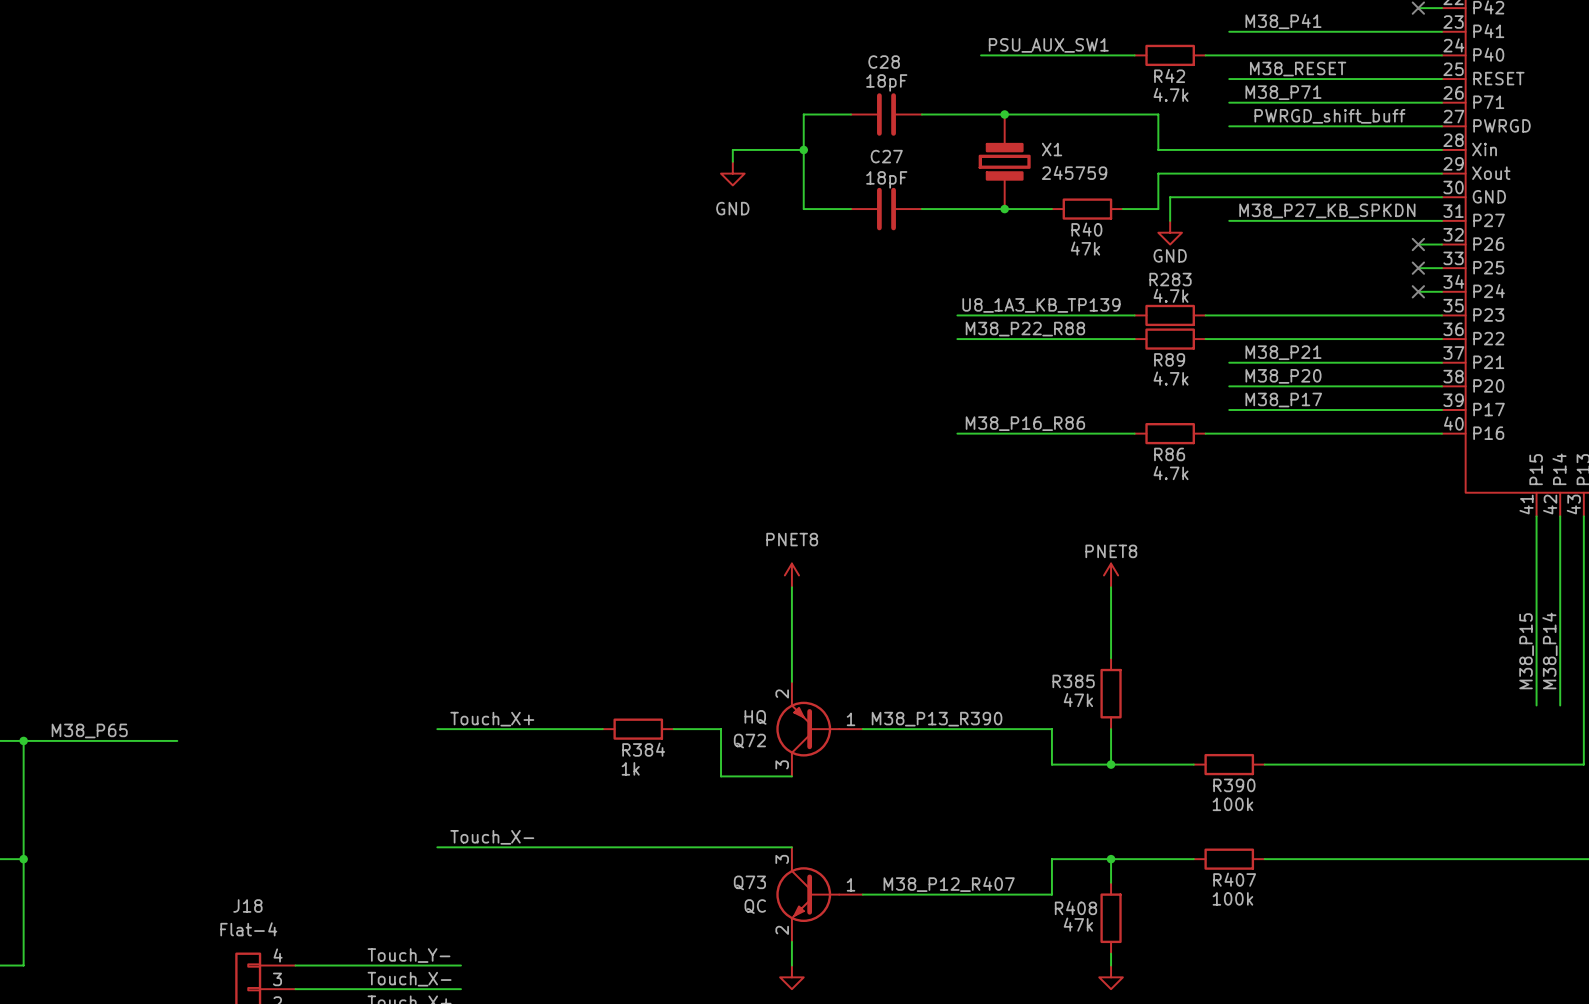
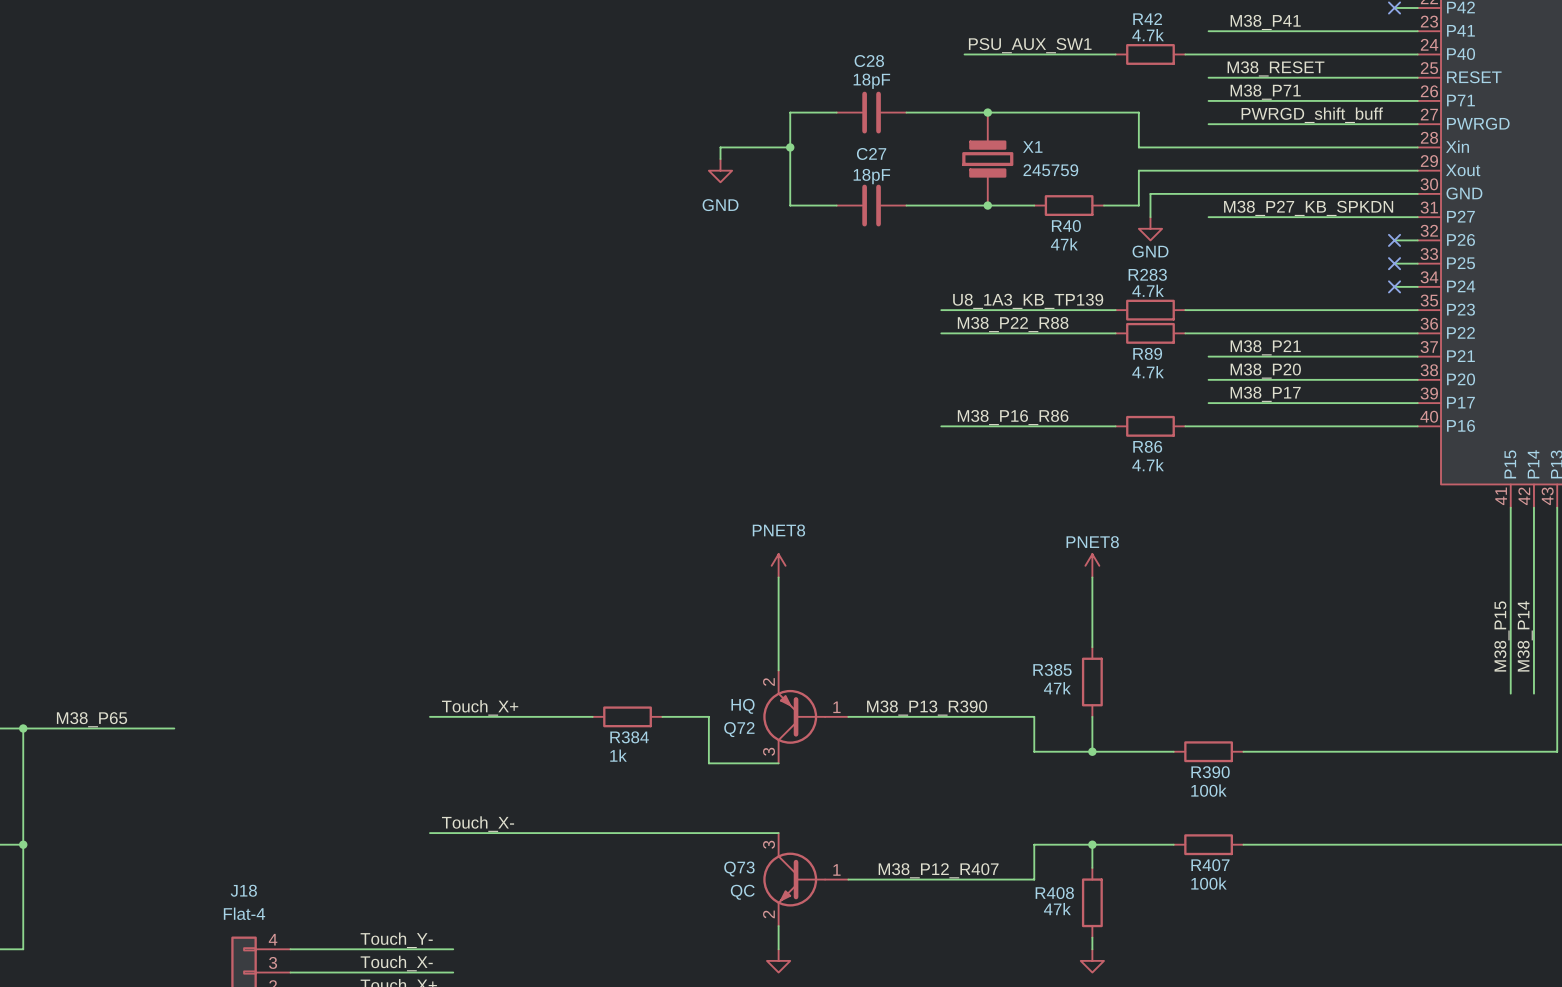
R42 name position: R42 (1169, 75) -> R42 (1147, 19)
R42 value position: 4.7k (1171, 94) -> 4.7k (1148, 35)

